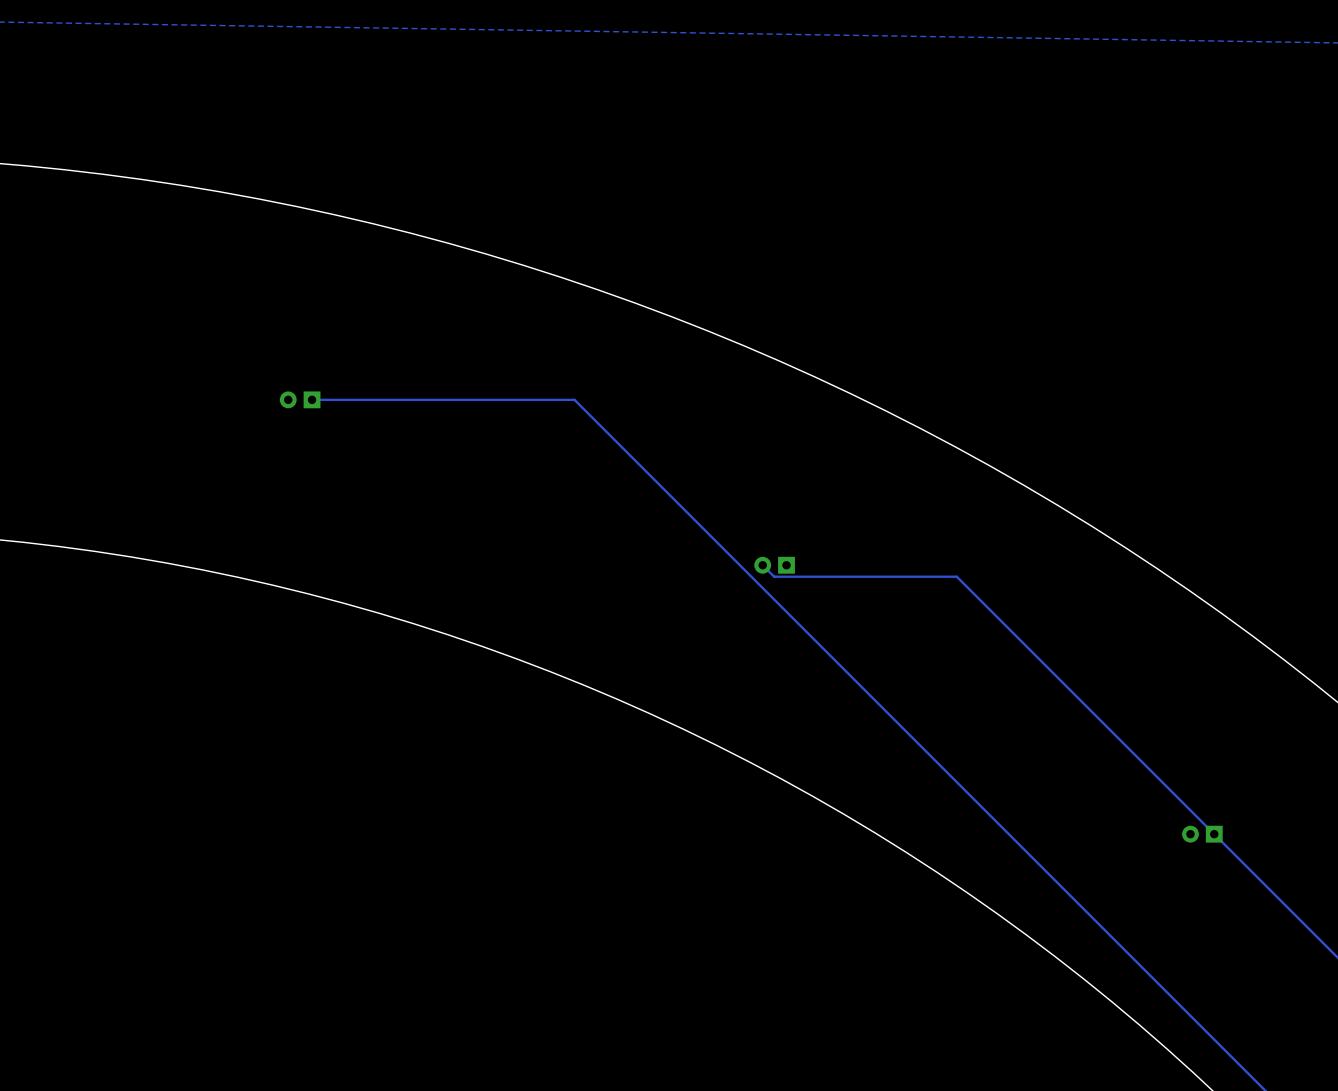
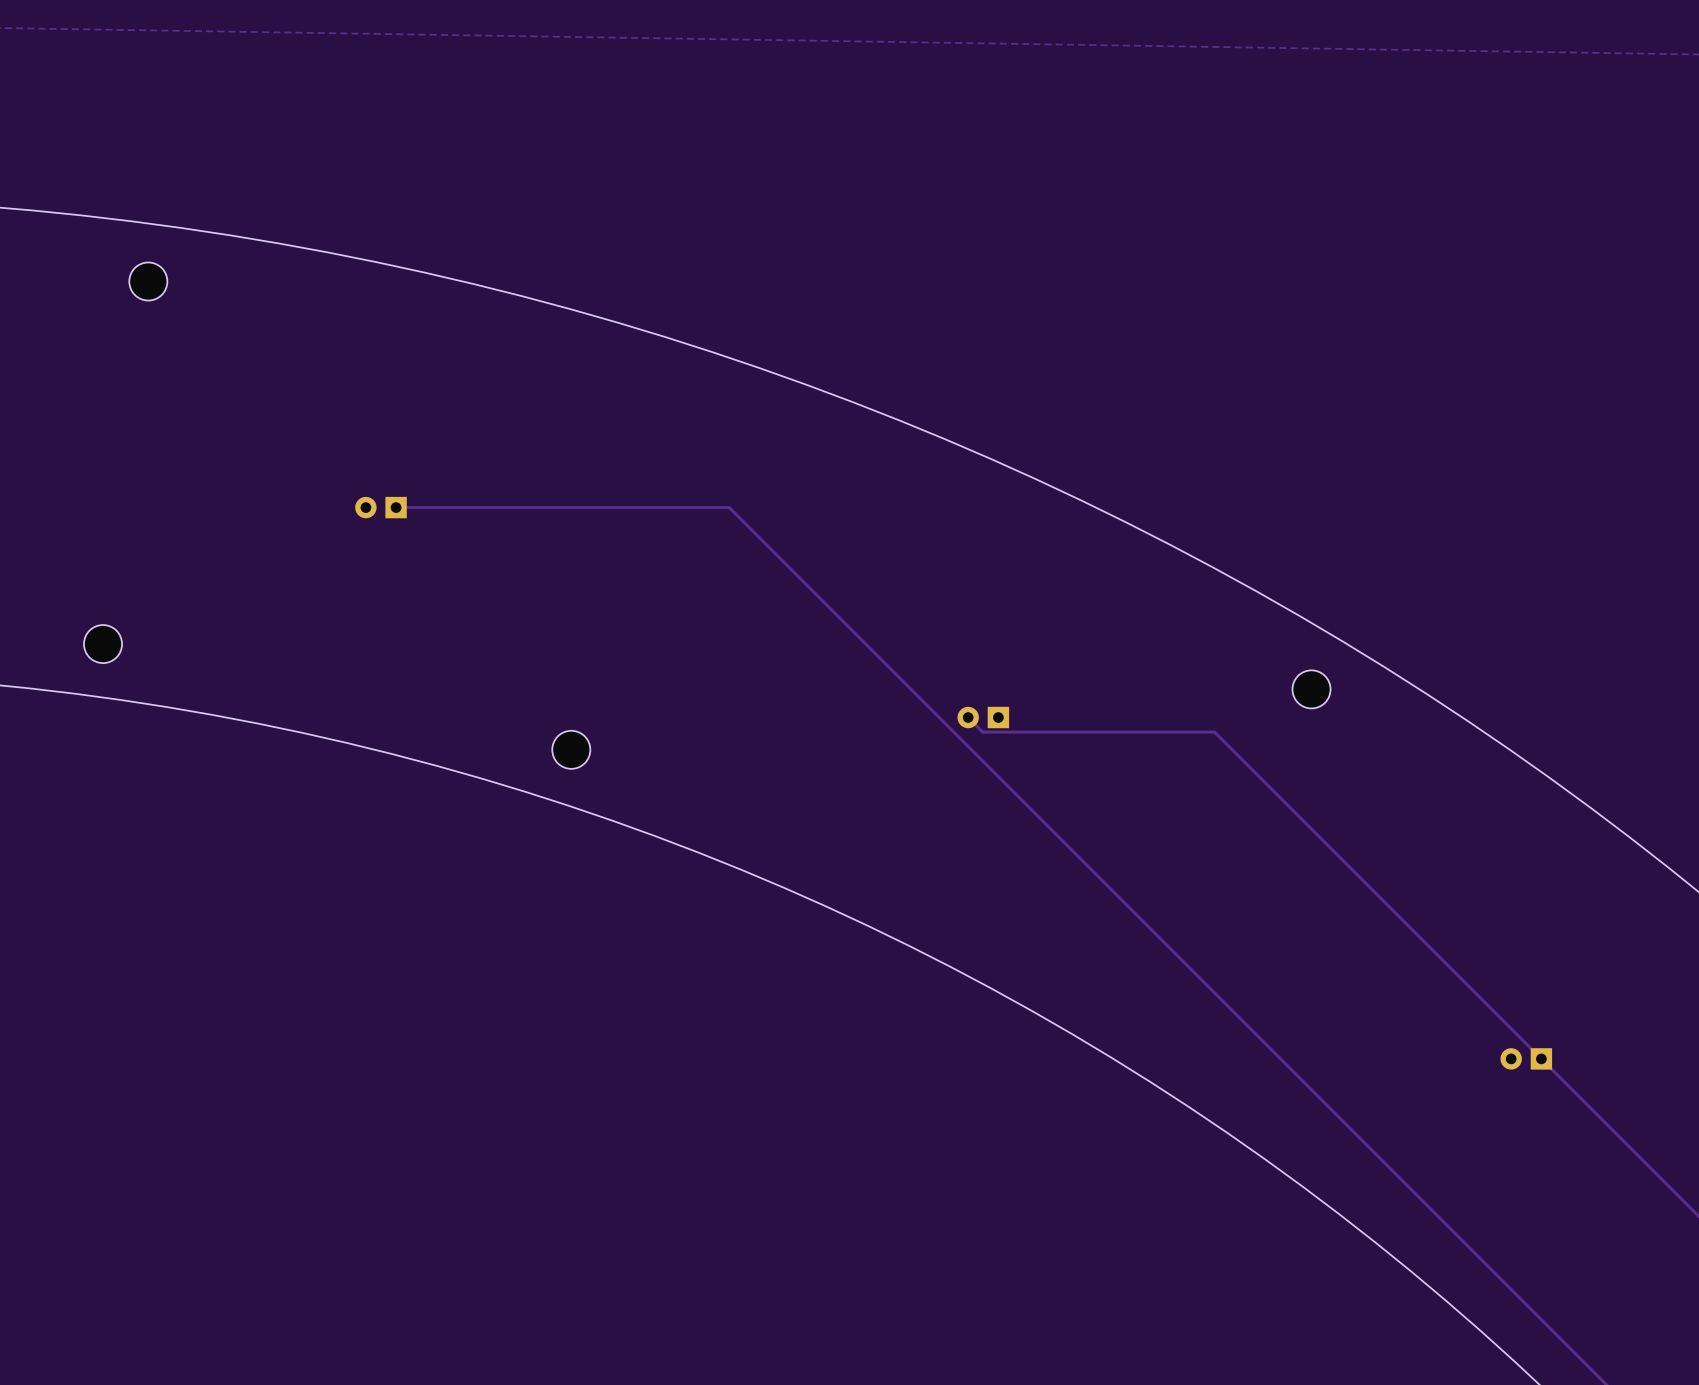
part: none -> (148, 281)
part: none -> (103, 644)
part: none -> (1311, 689)
part: none -> (571, 749)

